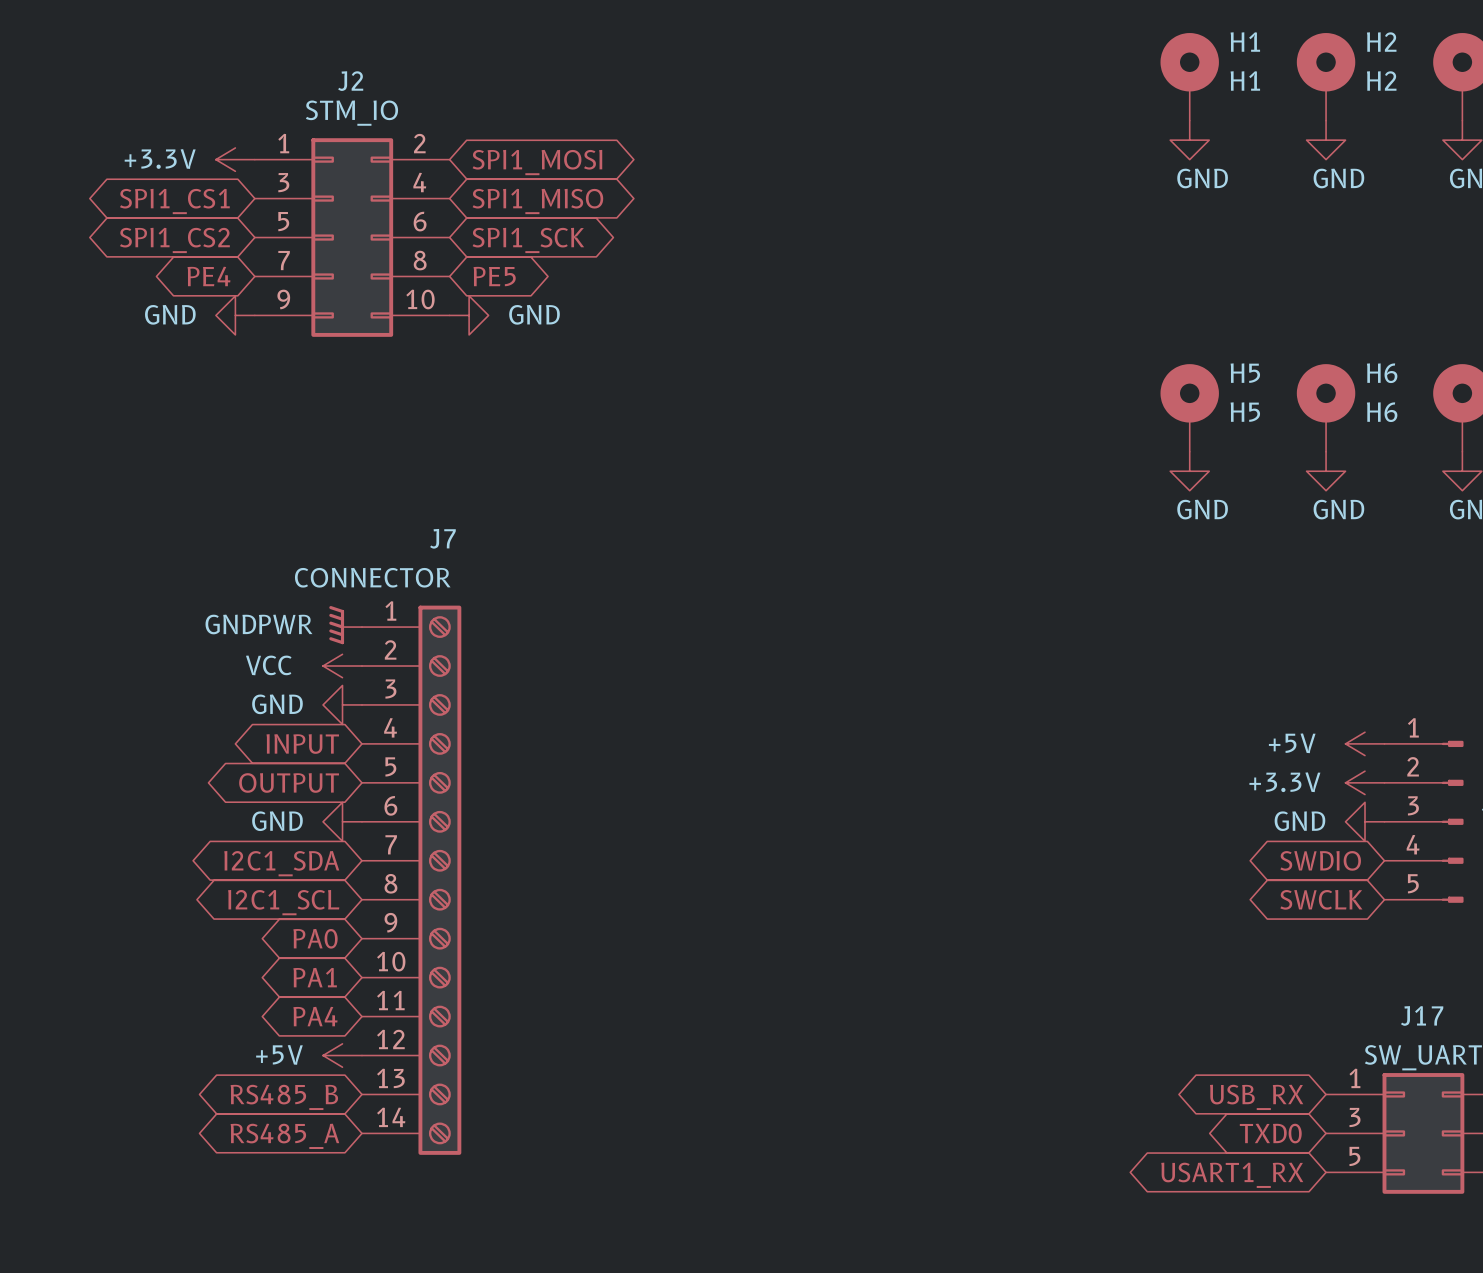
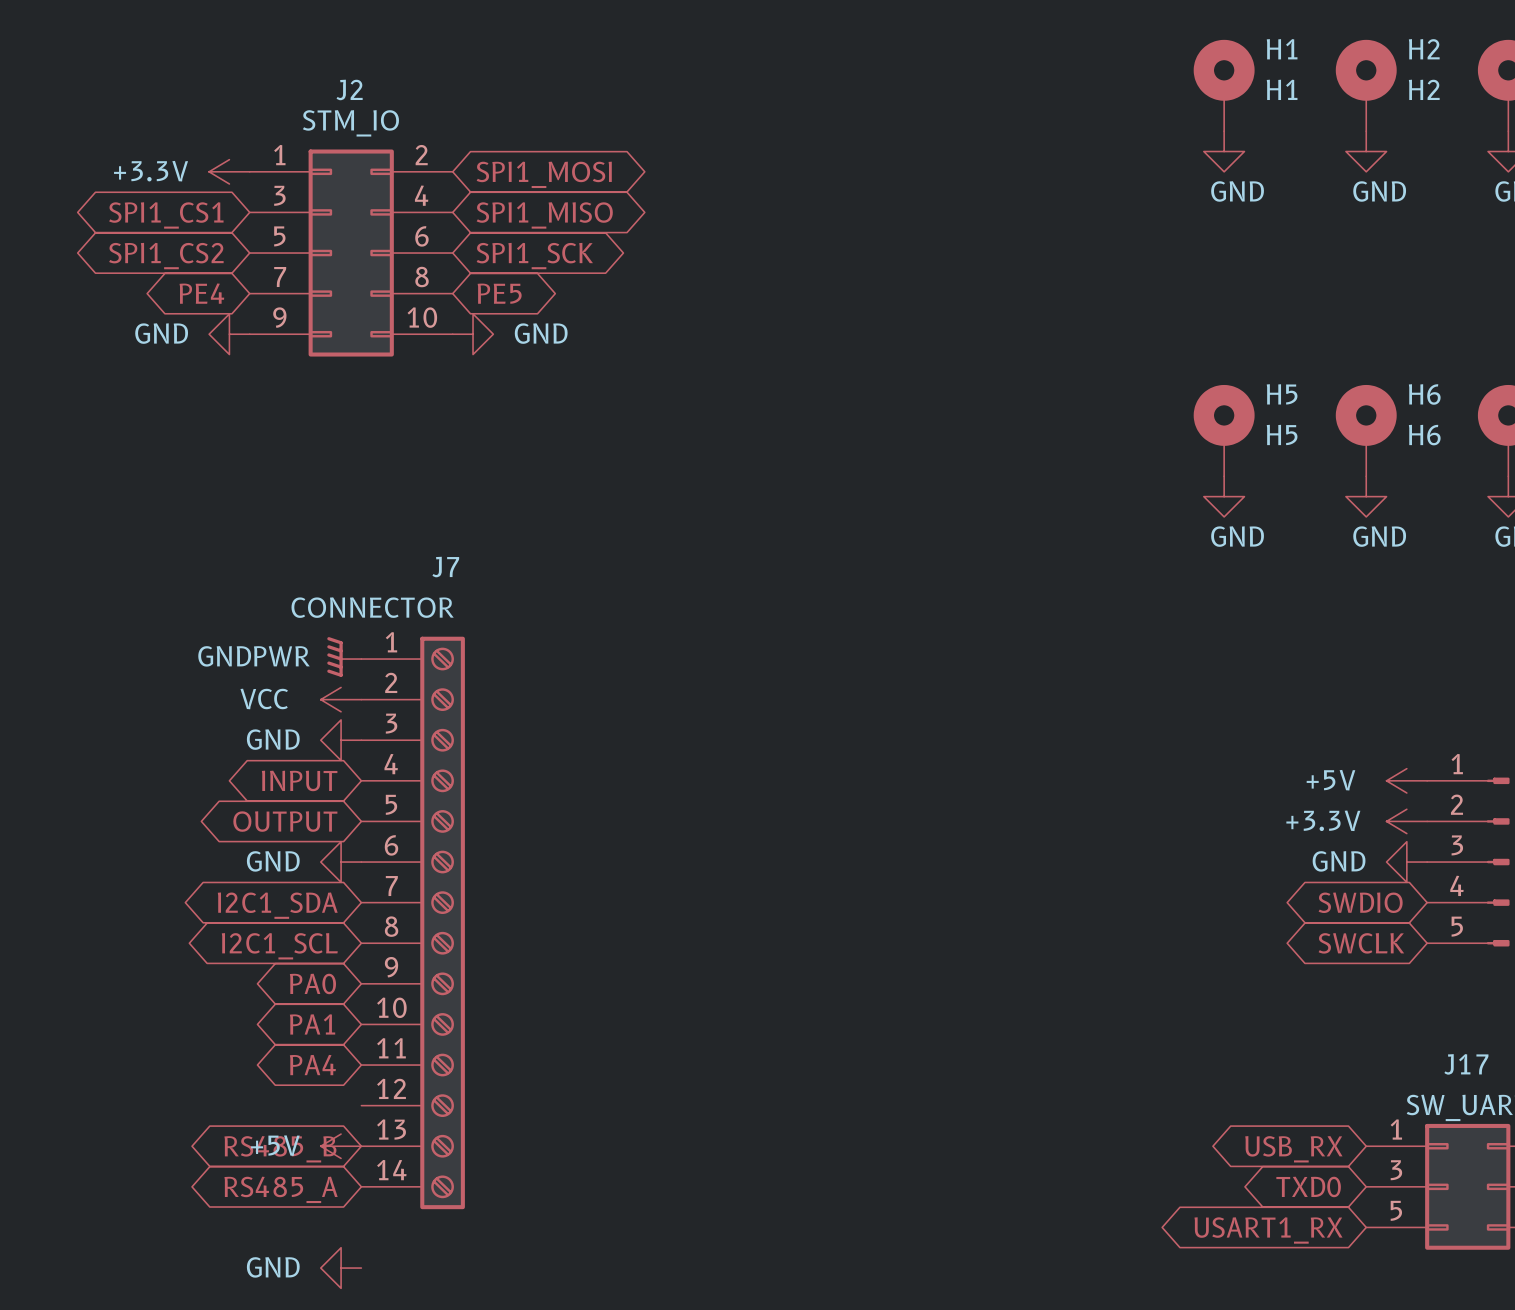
power symbol position: +5V (342, 1055) -> +5V (341, 1146)
power symbol: none -> GND (341, 1268)

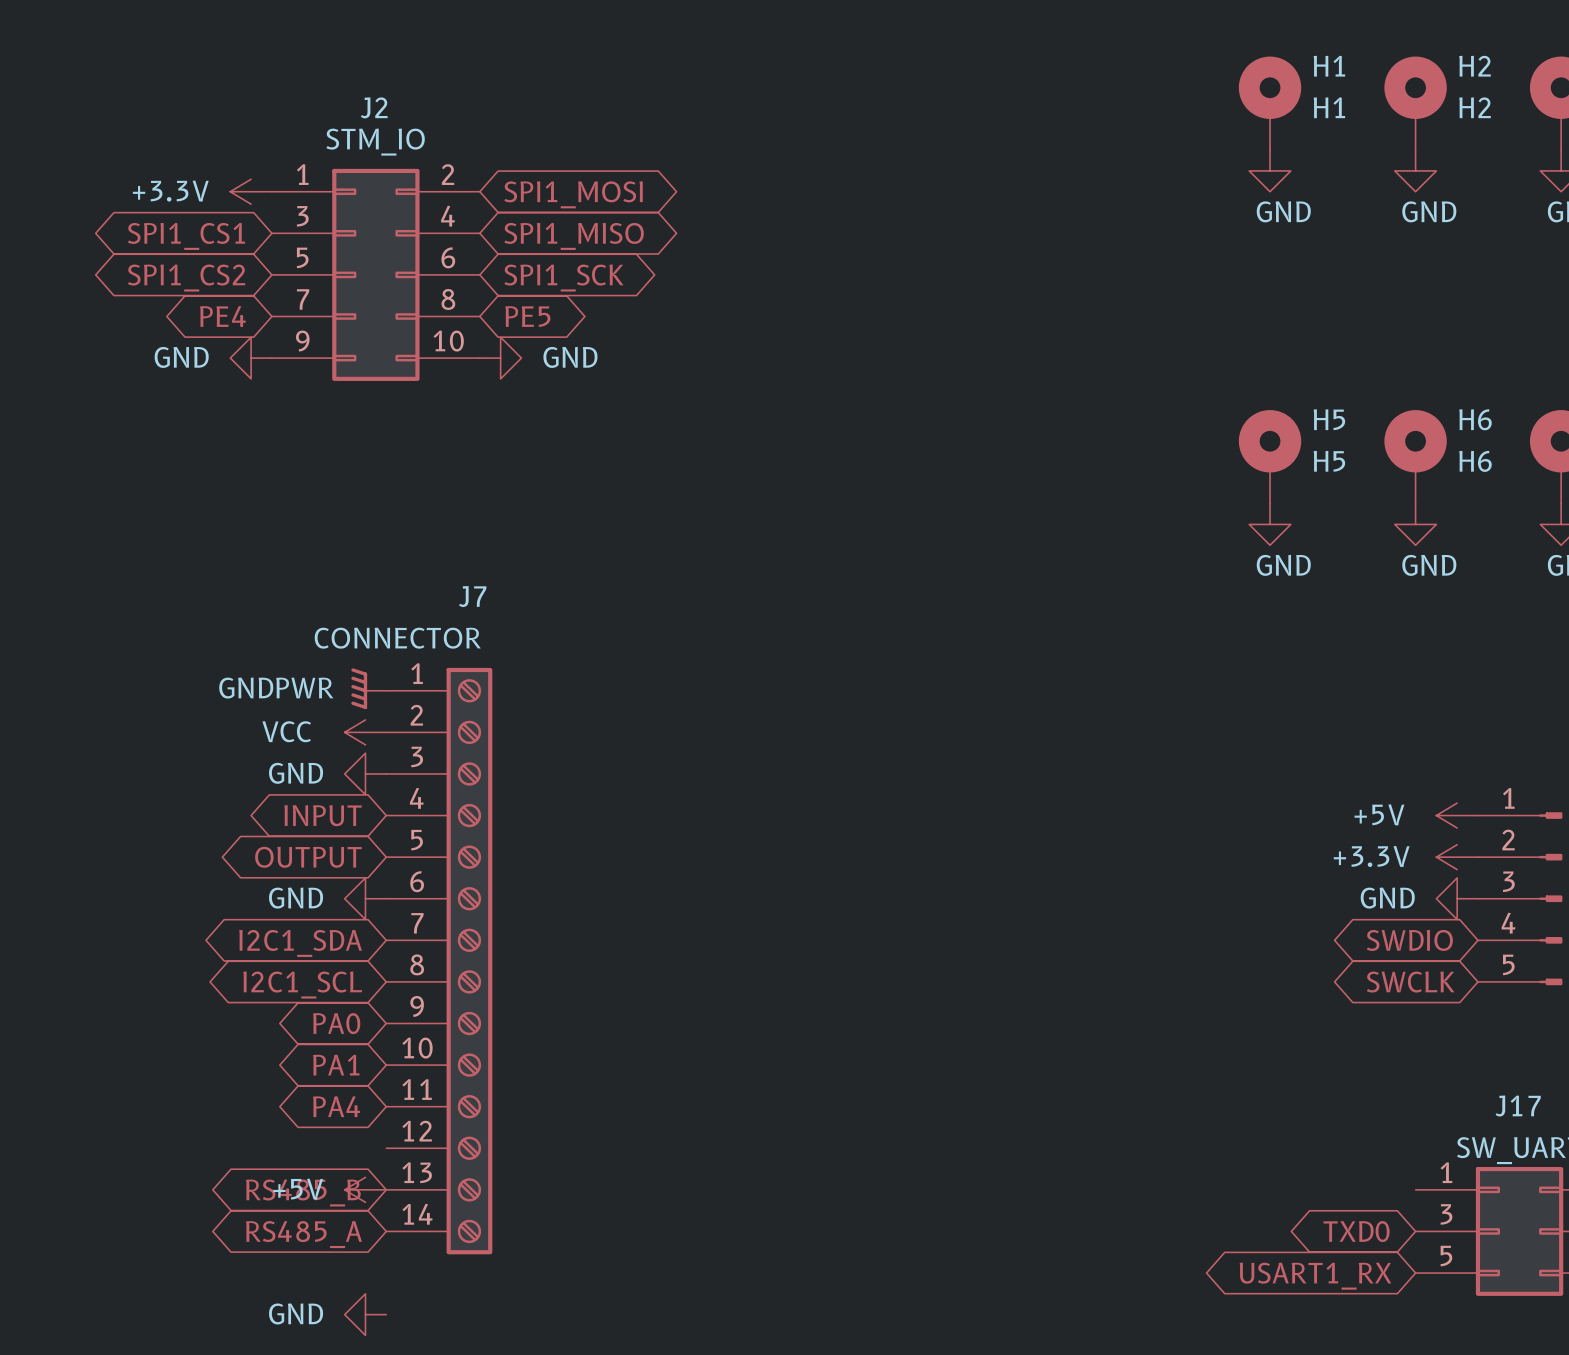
global label: USB_RX (1293, 1149) -> none

